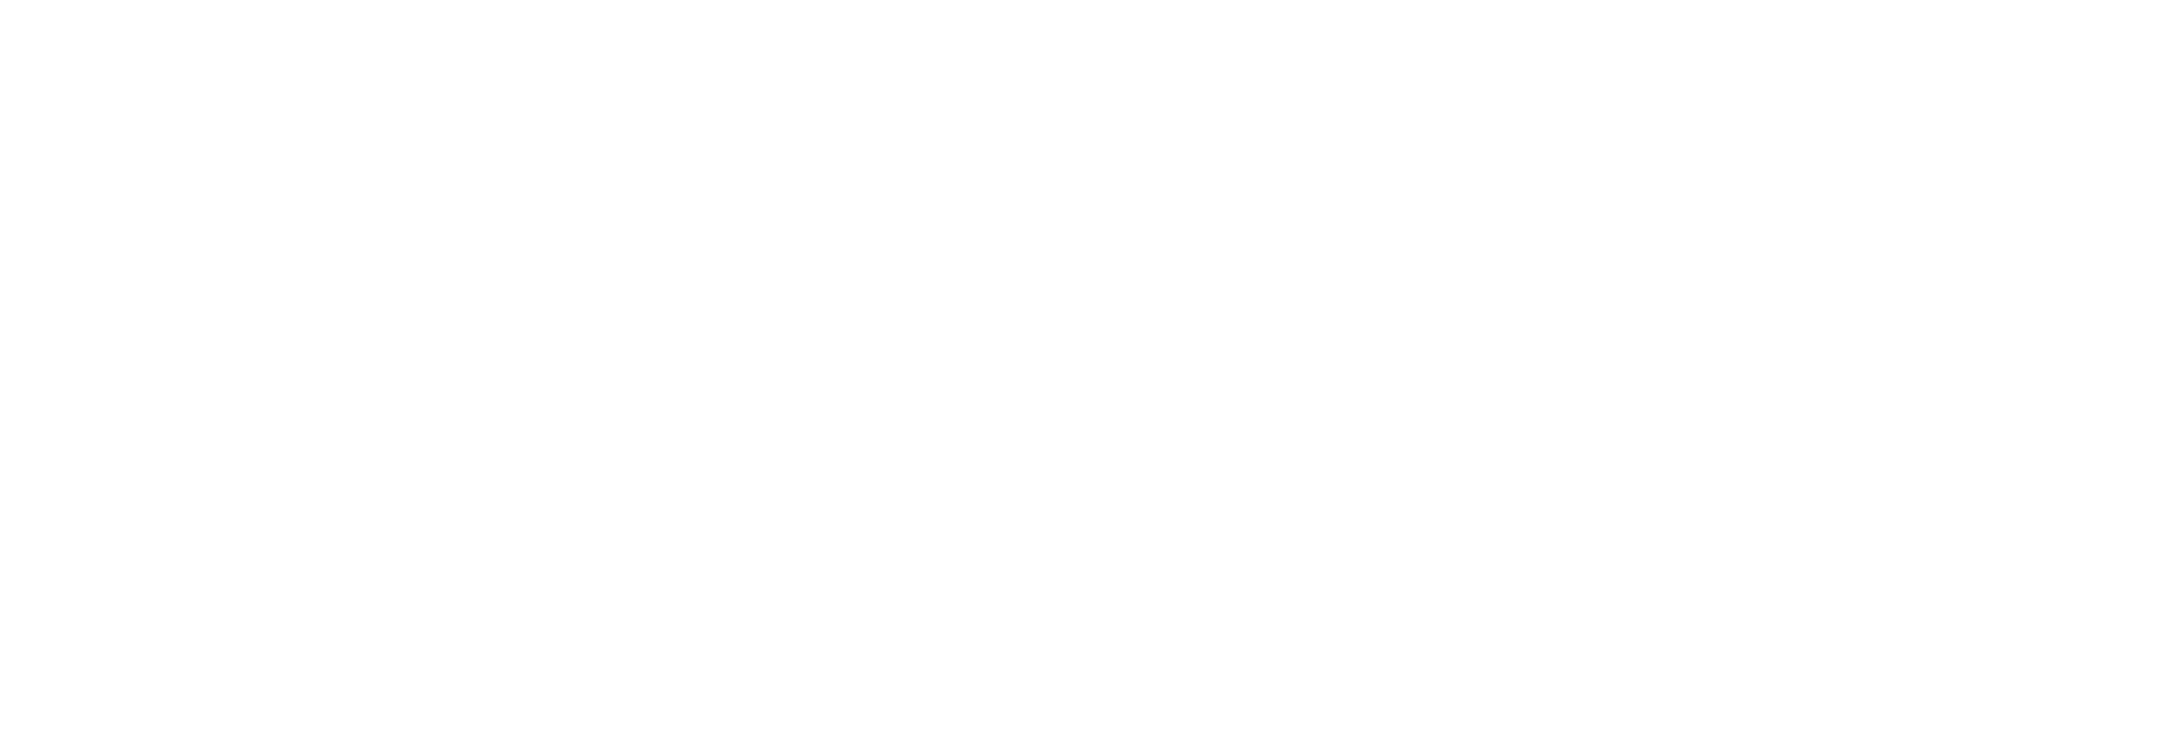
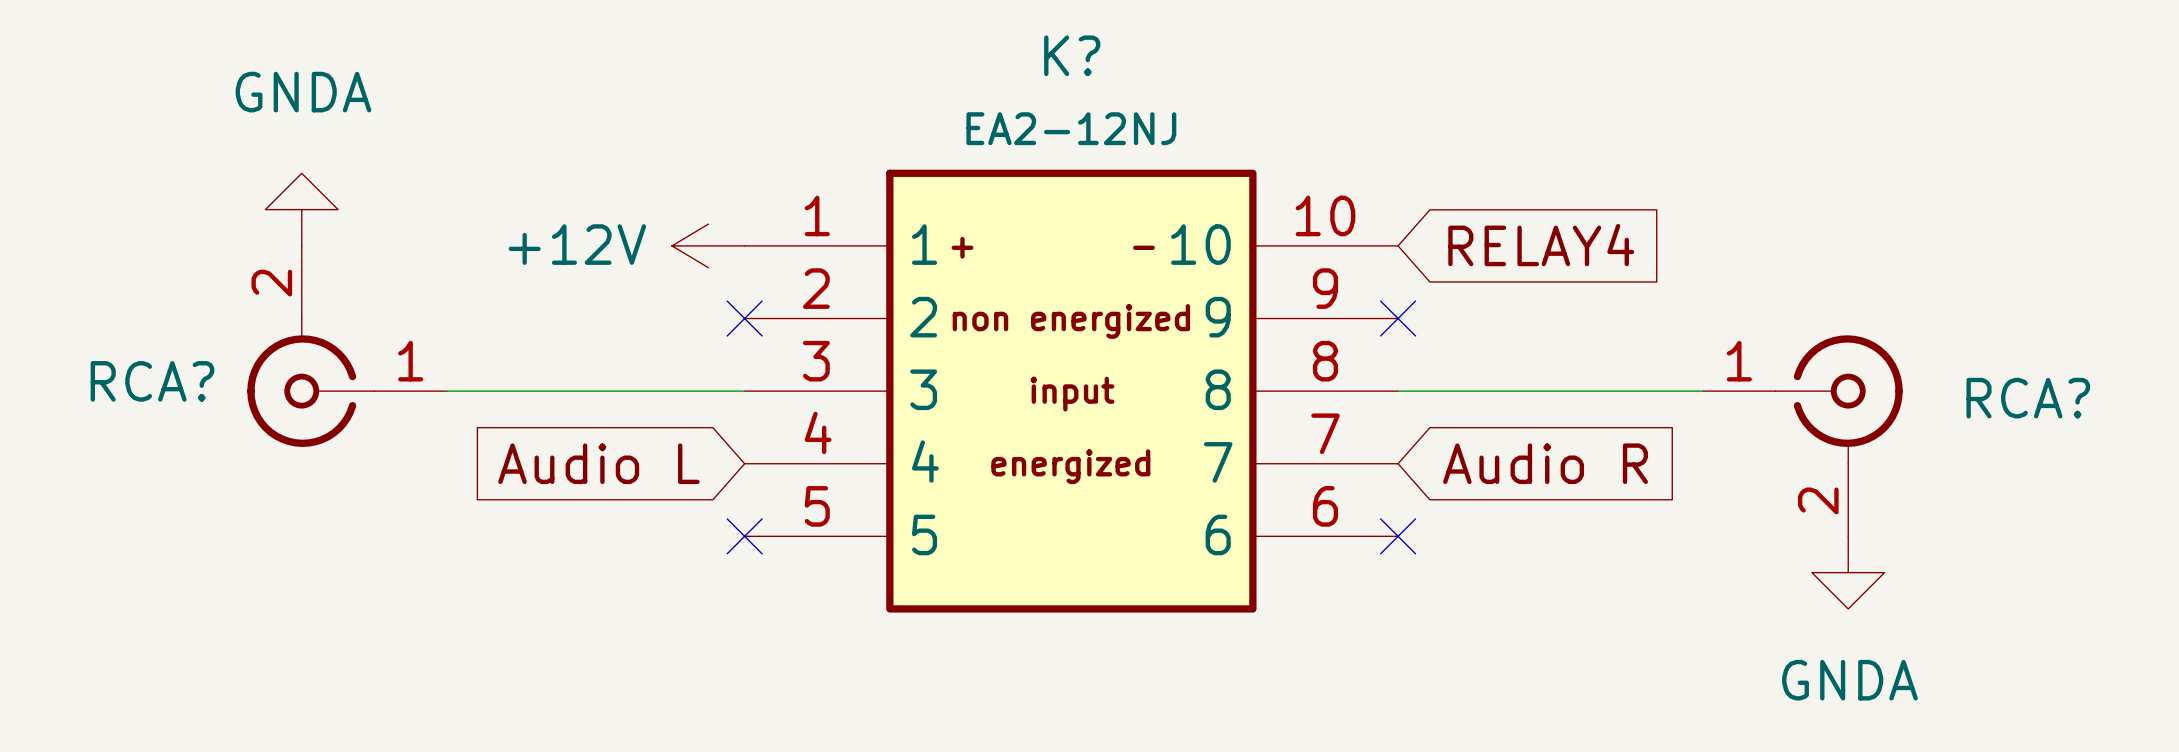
power symbol: none -> GNDA (301, 209)
power symbol: none -> +12V (708, 245)
global label: none -> RELAY4 (1541, 245)
no-connect mark: none -> (744, 318)
no-connect mark: none -> (1398, 318)
RCA?: none -> (347, 346)
wire: none -> (446, 391) (744, 391)
K?: none -> EA2-12NJ (1071, 391)
wire: none -> (1398, 391) (1703, 391)
RCA?: none -> (1802, 435)
global label: none -> Audio L (598, 463)
global label: none -> Audio R (1545, 463)
no-connect mark: none -> (744, 536)
no-connect mark: none -> (1398, 536)
power symbol: none -> GNDA (1848, 572)

